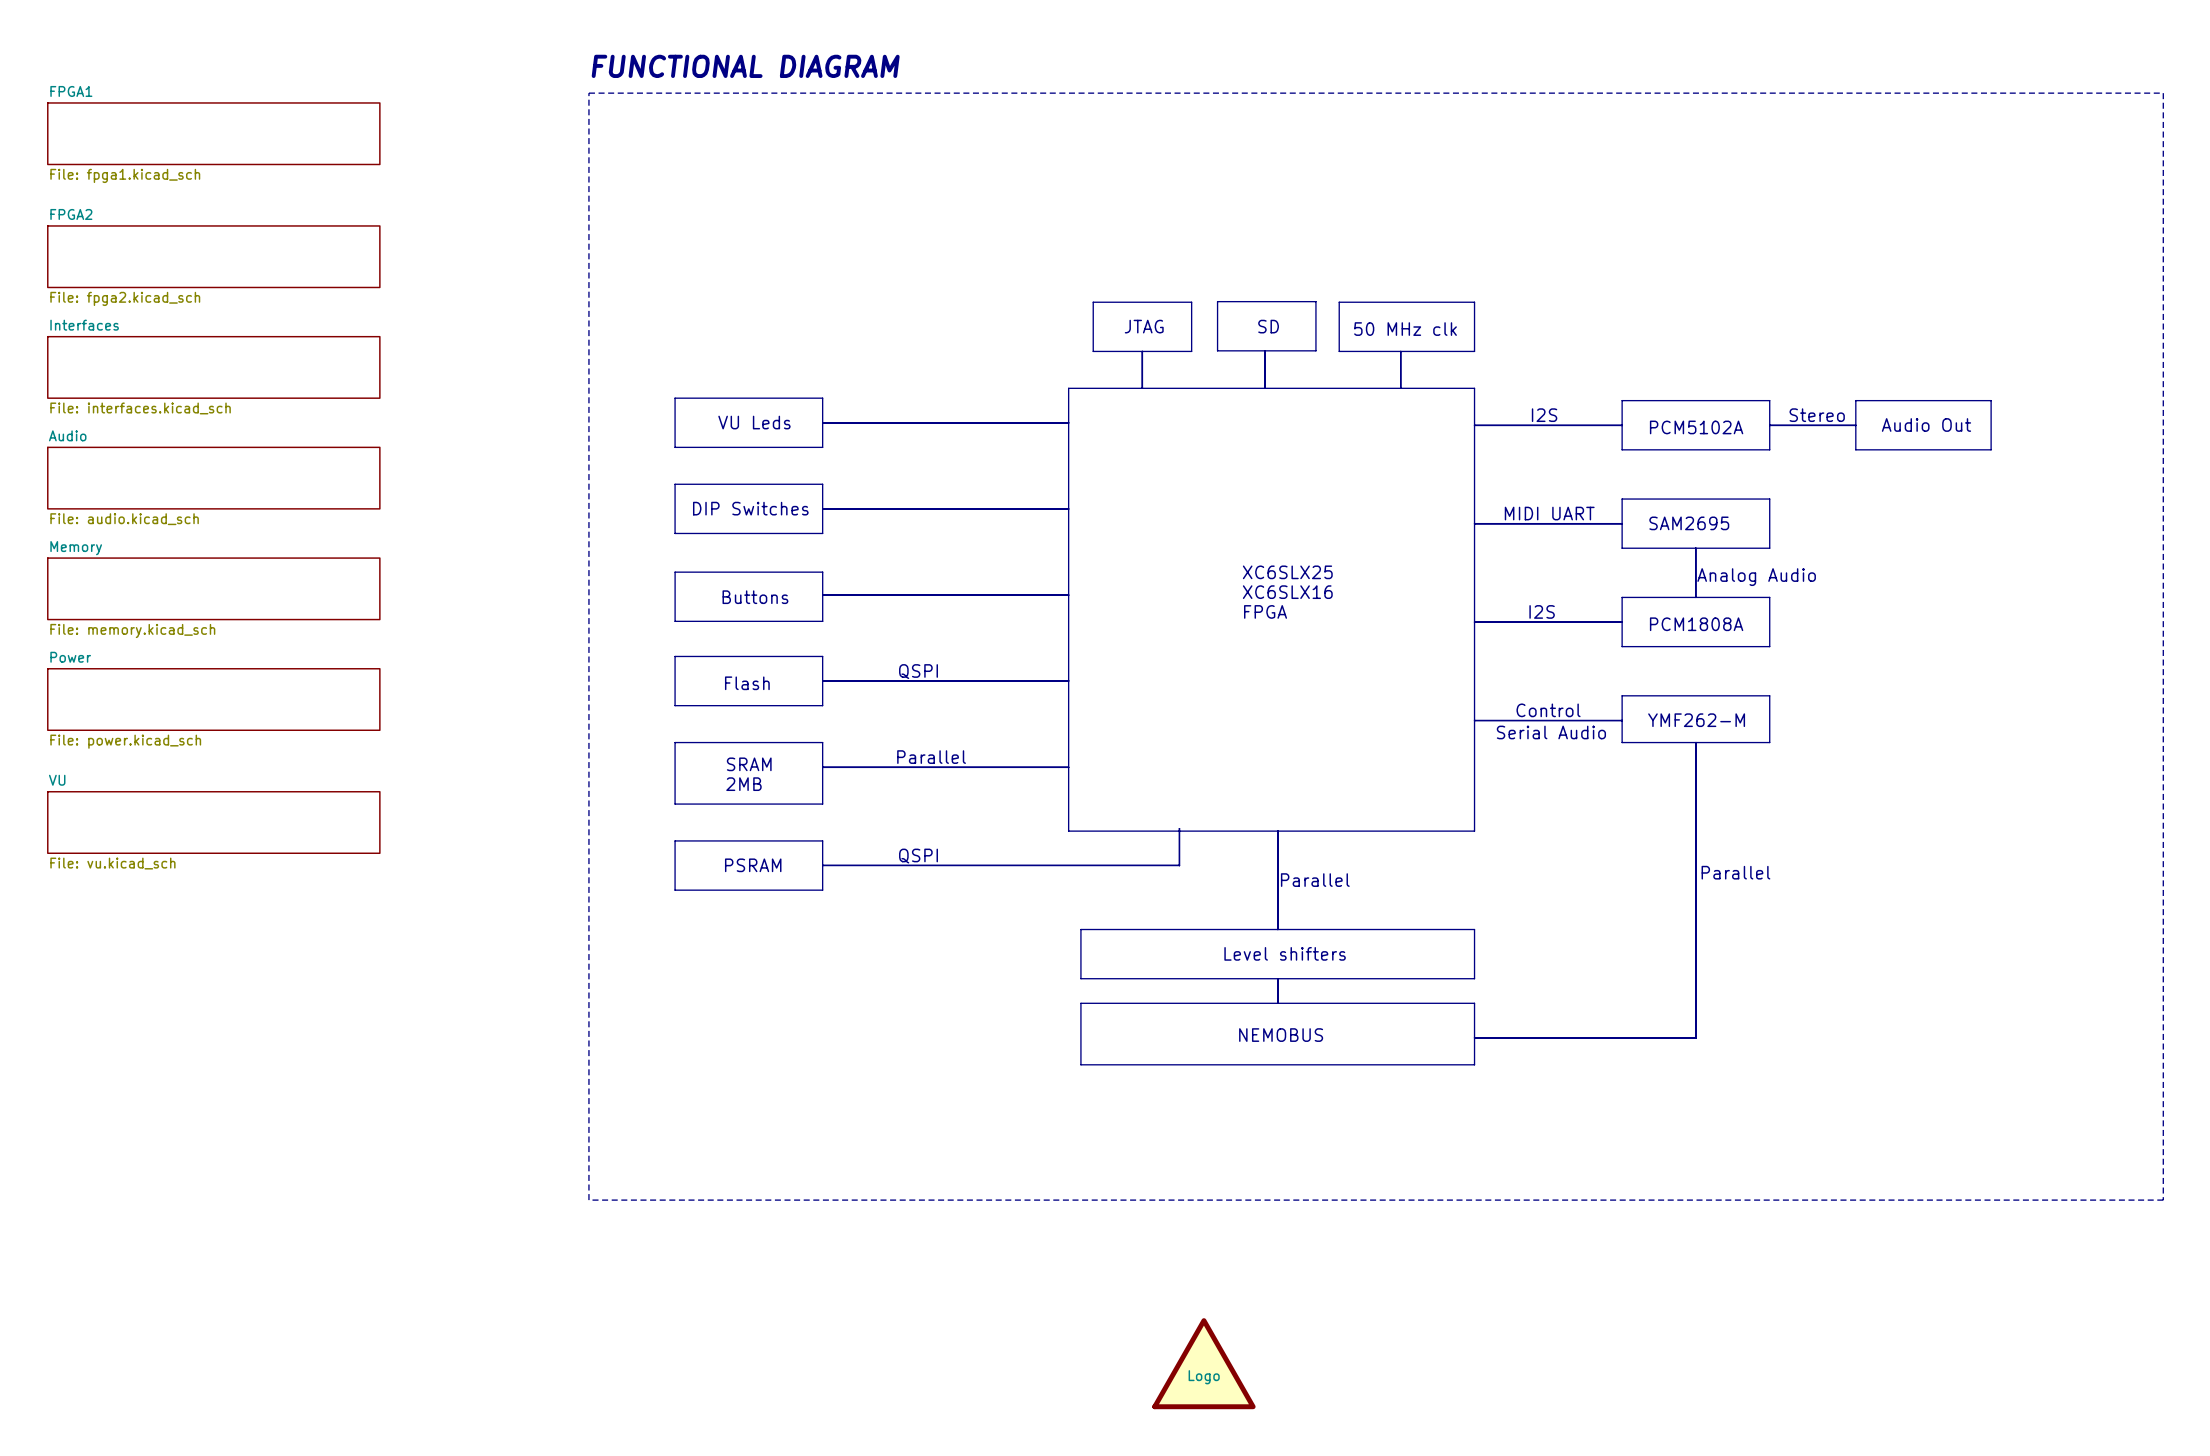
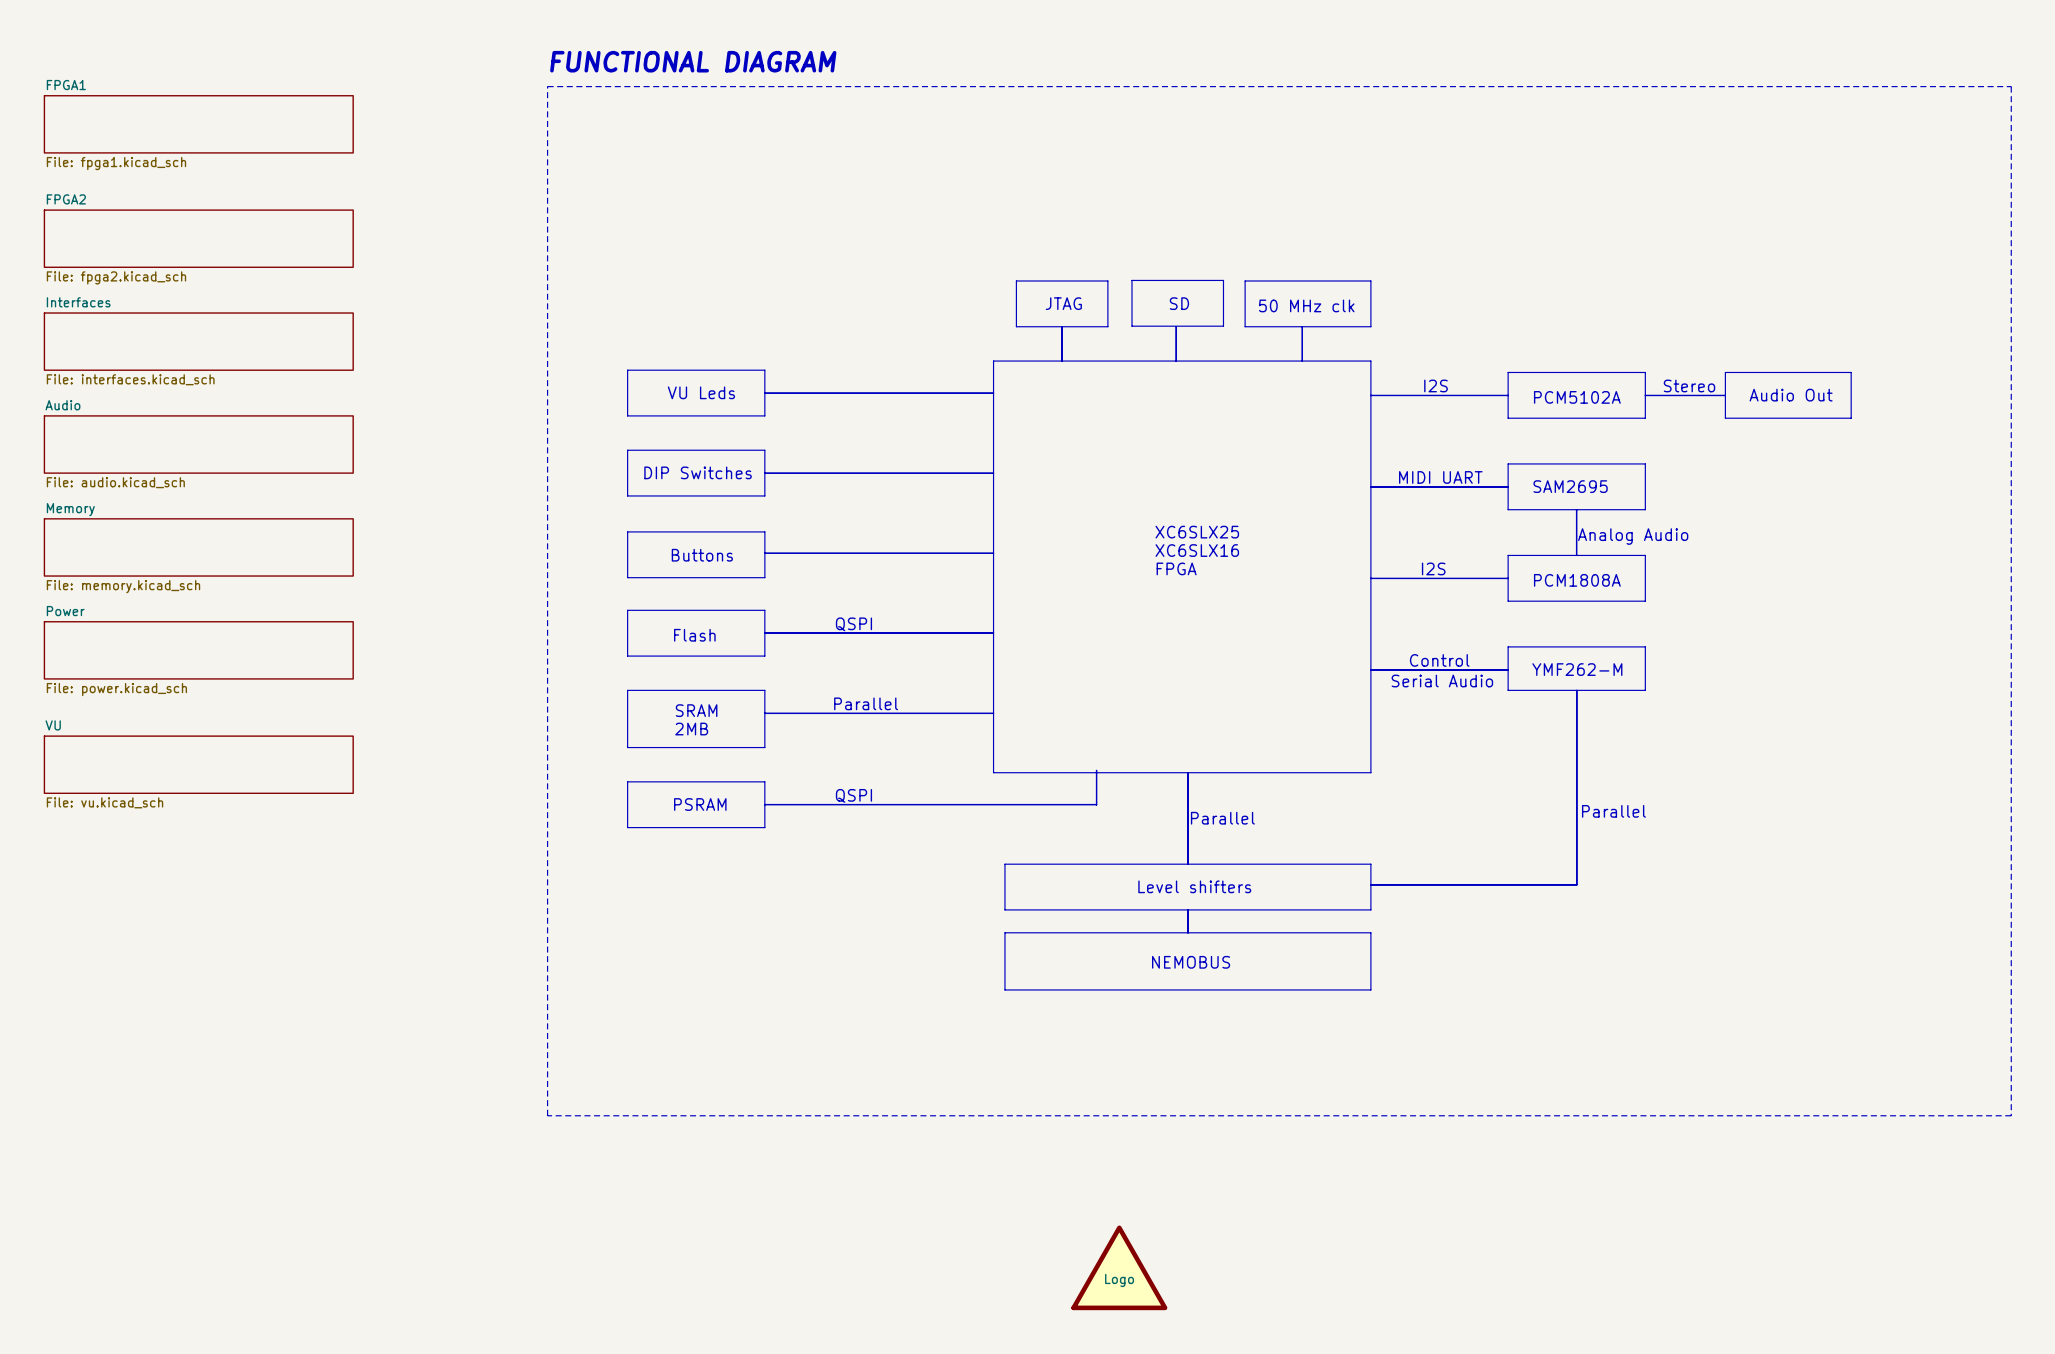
line: (1695, 951) (1695, 1037) (1474, 1037) -> (1576, 885) (1370, 885)
line: (1696, 951) (1696, 1037) (1474, 1037) -> (1576, 884) (1370, 884)

